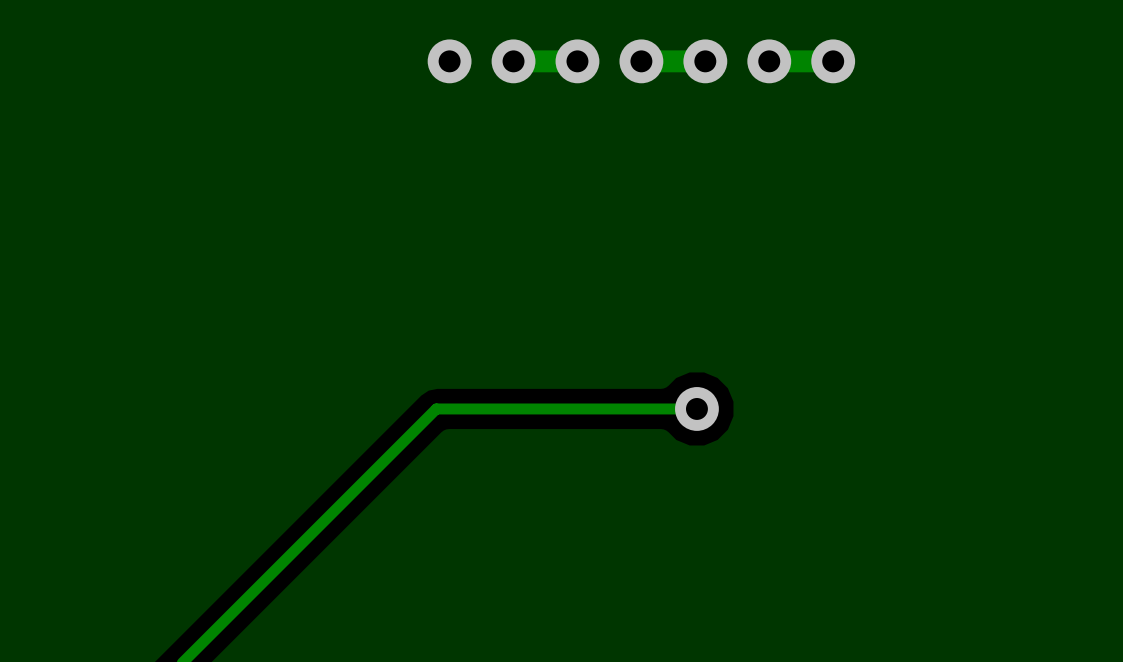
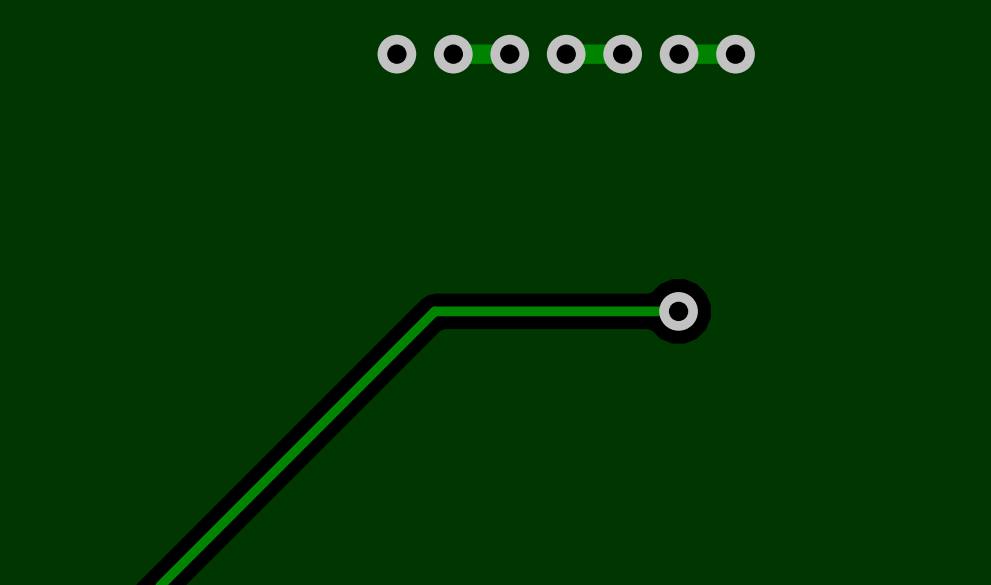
track: (696, 408) (436, 408) -> (678, 311) (434, 311) (385, 361)
via position: (696, 408) -> (678, 311)

